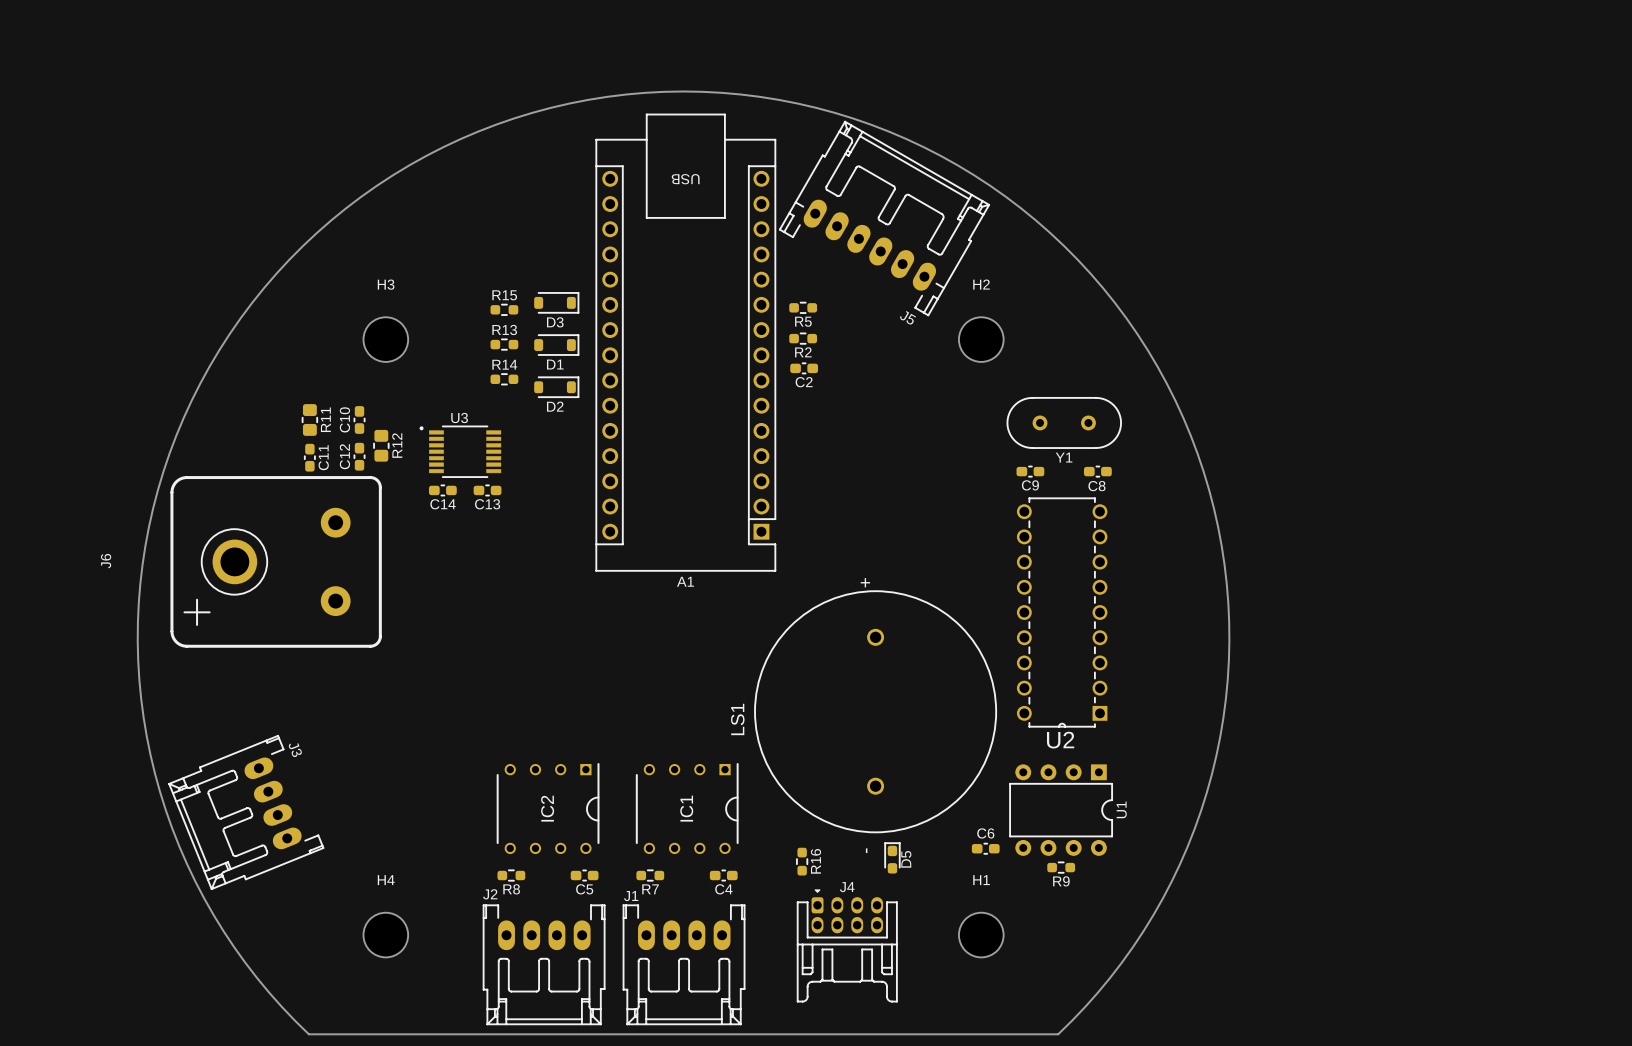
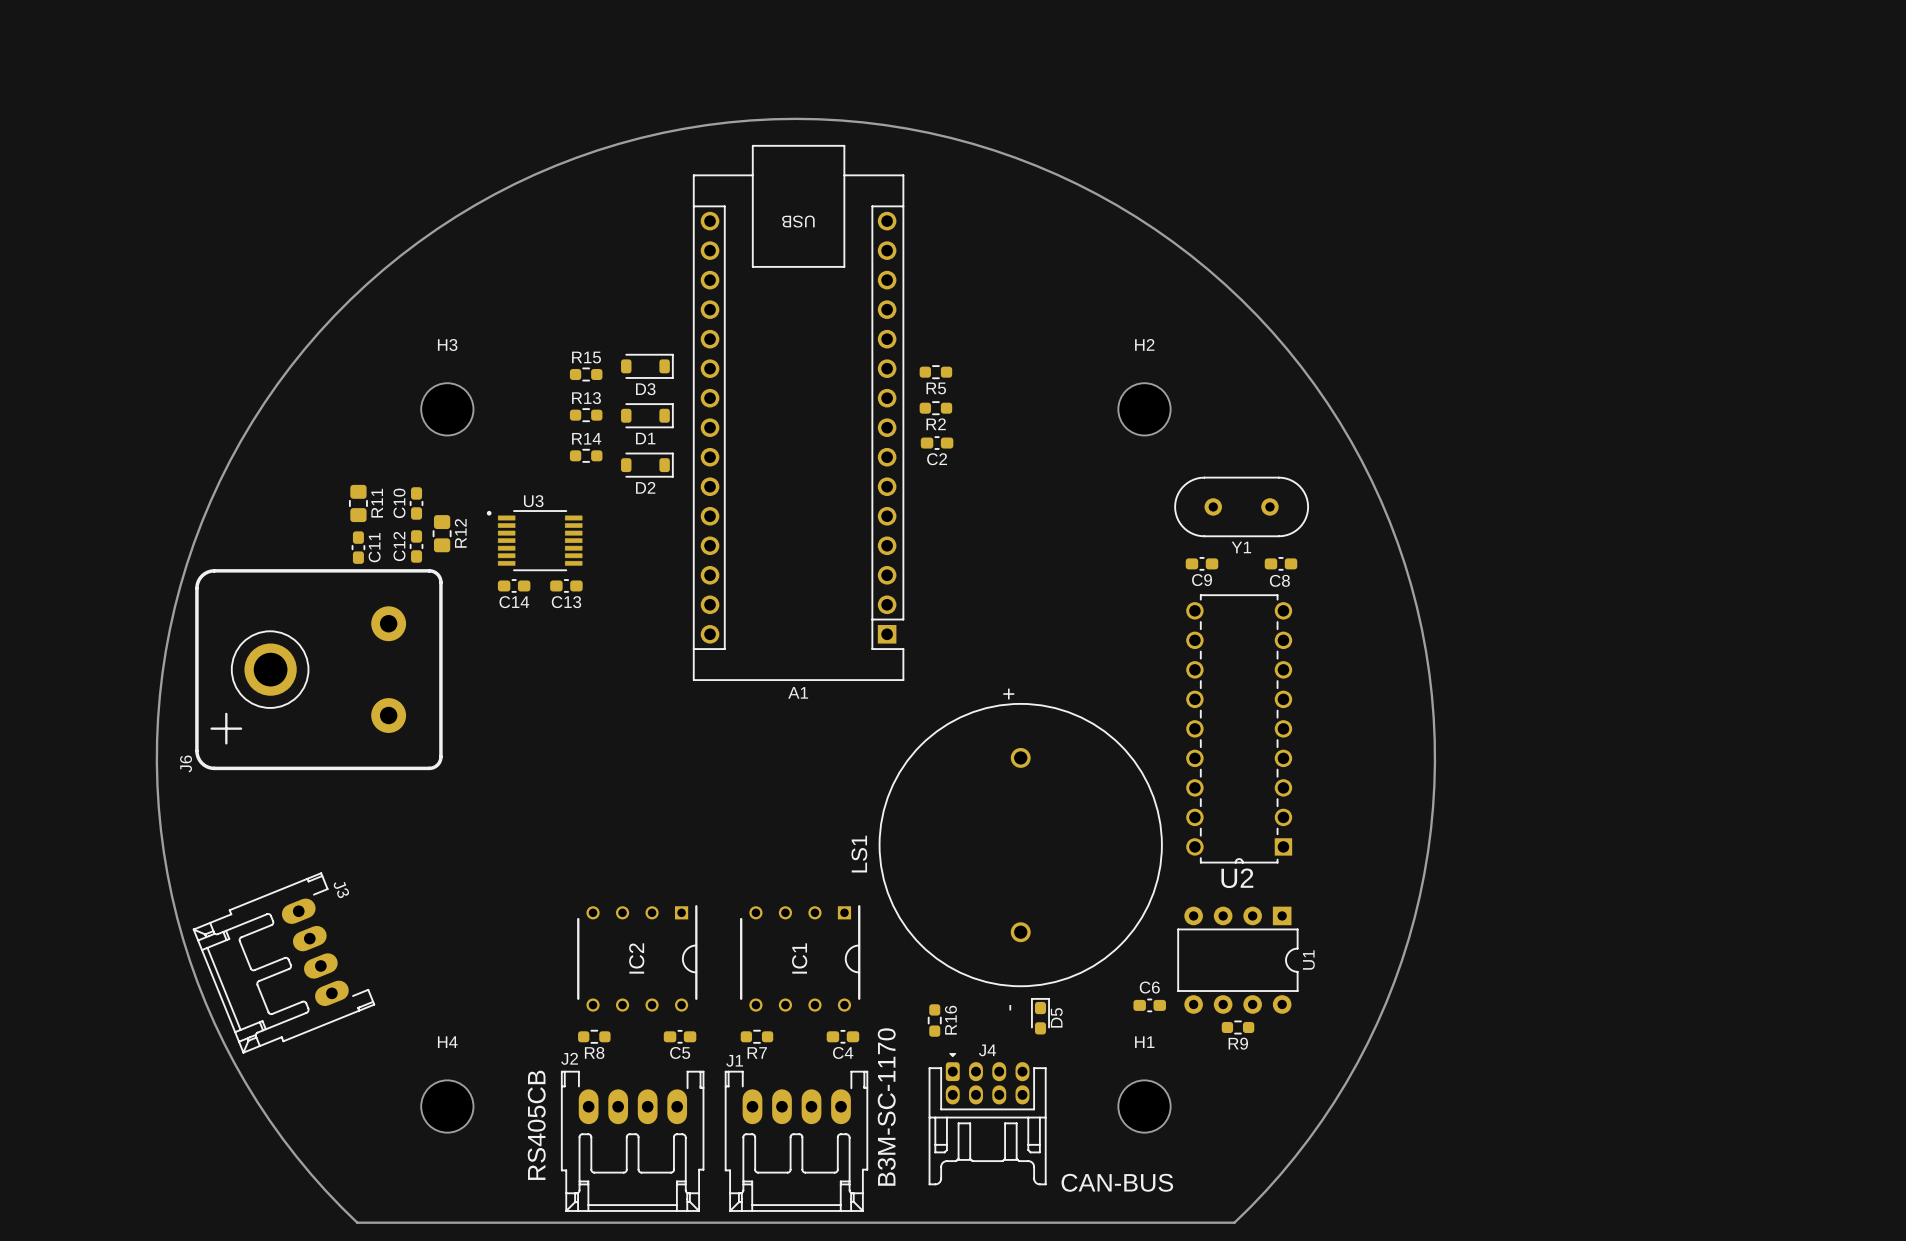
J5: (884, 218) -> none
J6 name position: J6 (106, 561) -> J6 (186, 763)
text: none -> B3M-SC-1170 (886, 1107)
text: none -> RS405CB (536, 1125)
text: none -> CAN-BUS (1117, 1182)

